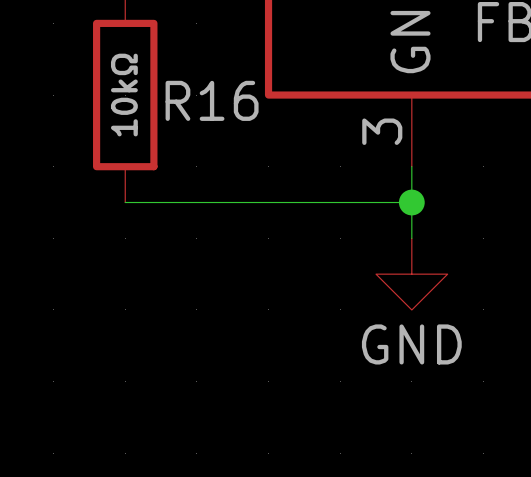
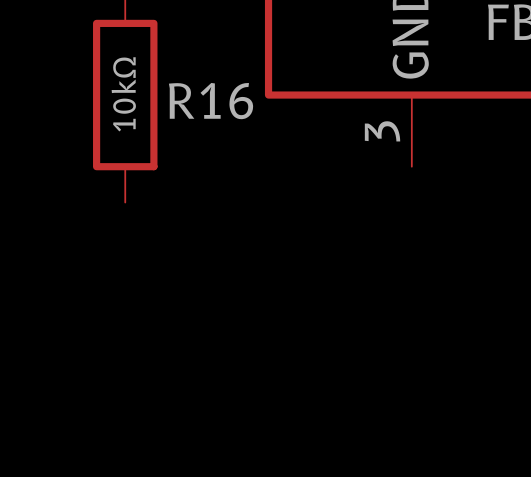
wire: (411, 166) (411, 238) -> none
wire: (125, 202) (411, 202) -> none
junction: (411, 202) -> none
power symbol: GND (411, 274) -> none

